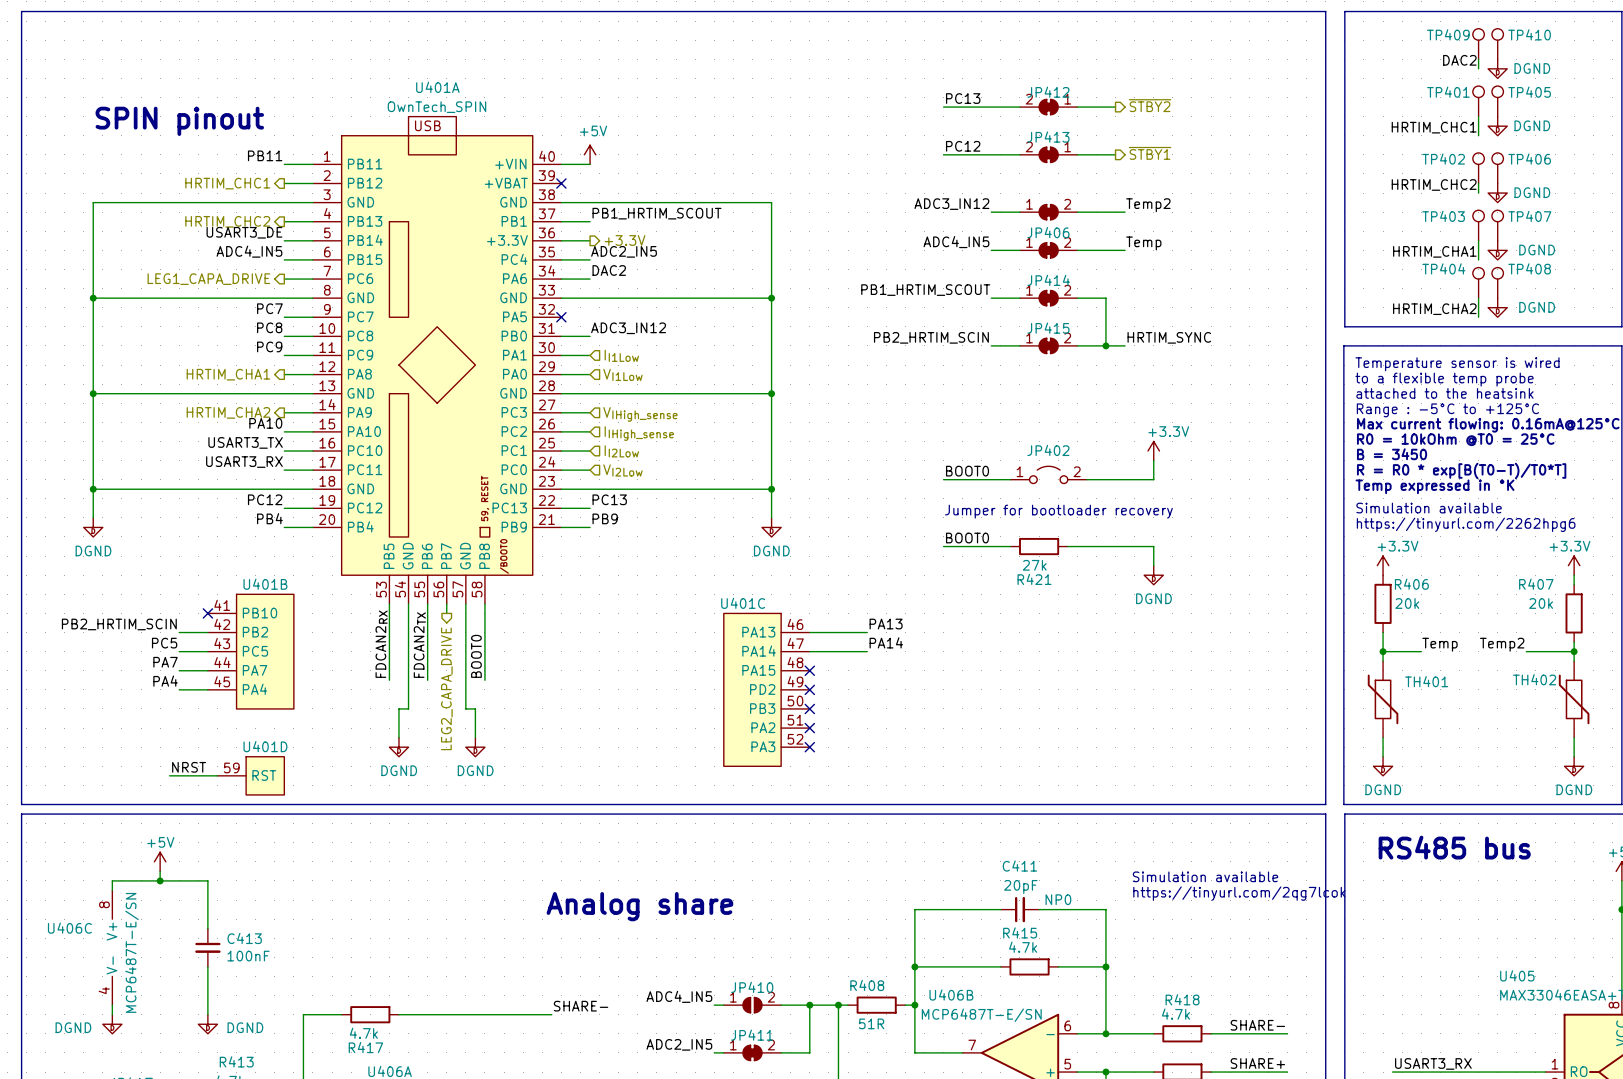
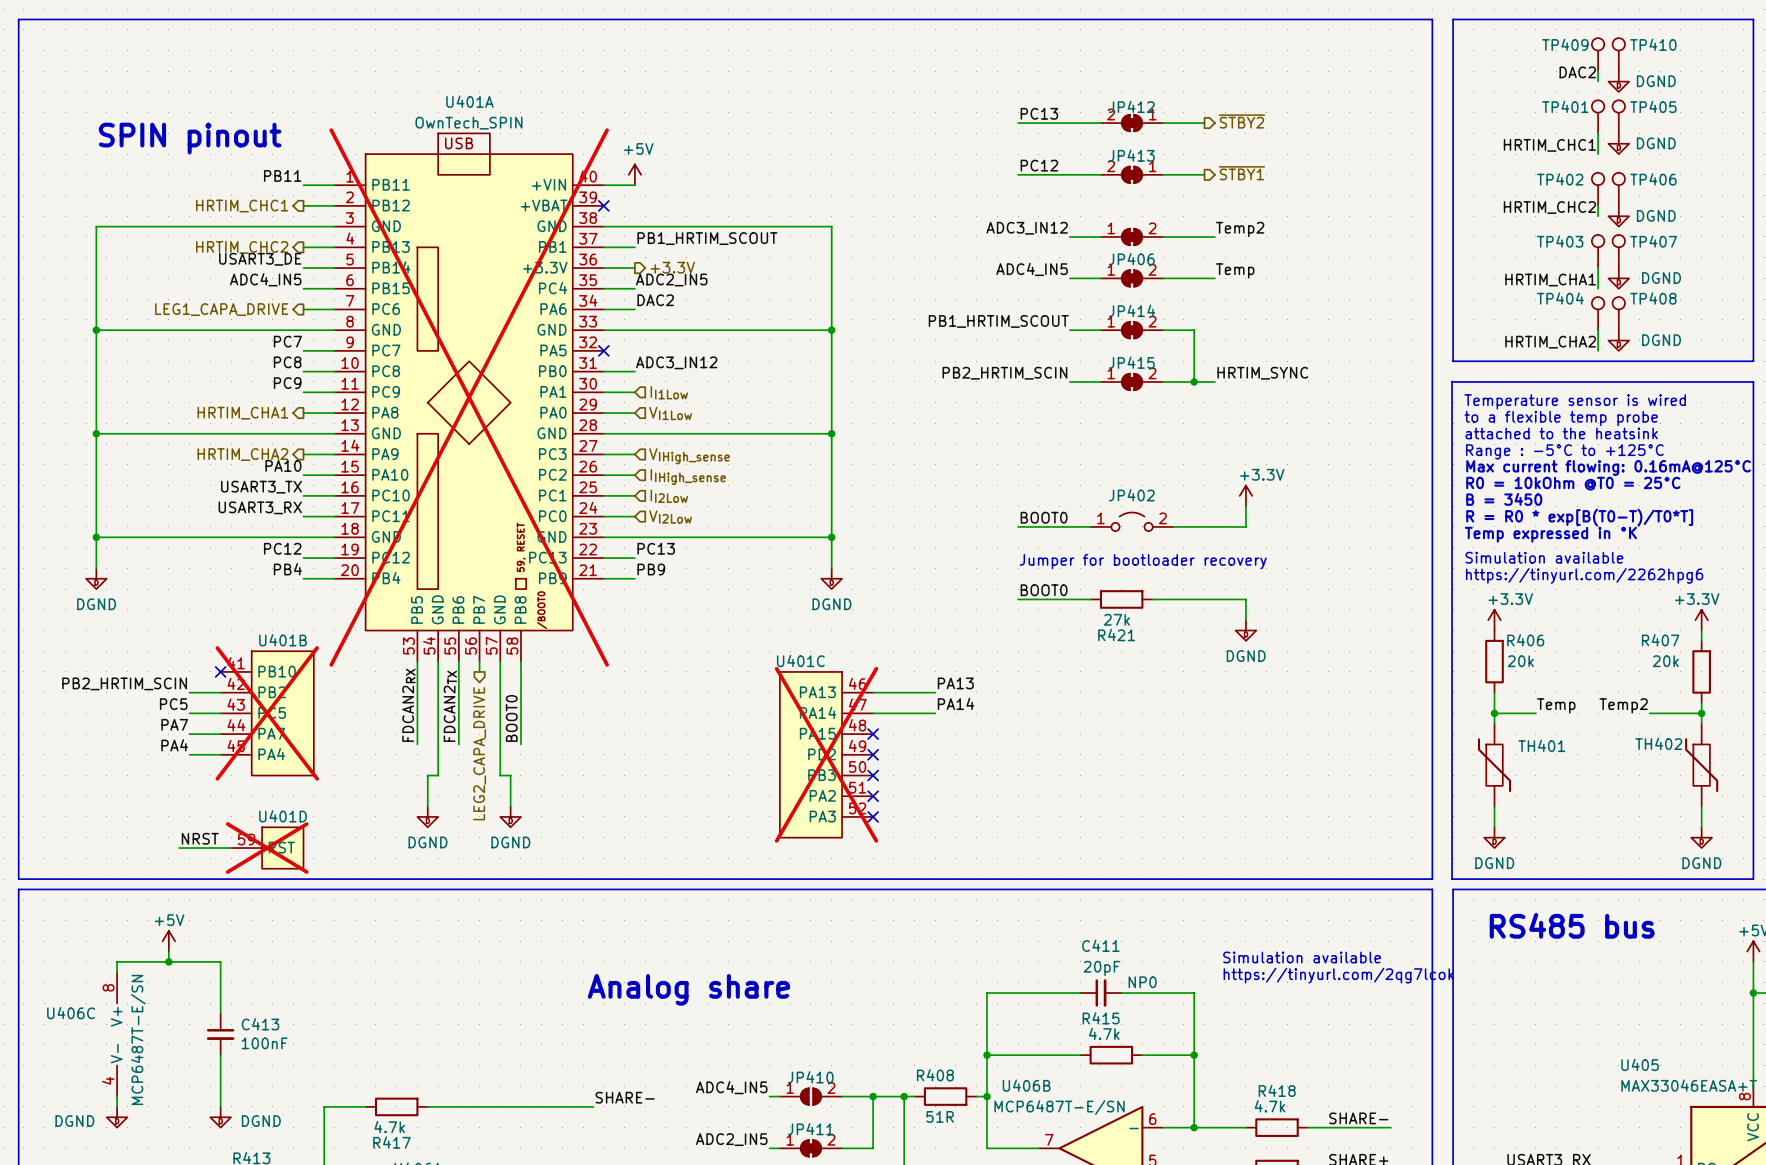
U401A do-not-place cross: none -> (469, 397)
U401B do-not-place cross: none -> (267, 713)
U401C do-not-place cross: none -> (826, 754)
U401D do-not-place cross: none -> (267, 848)

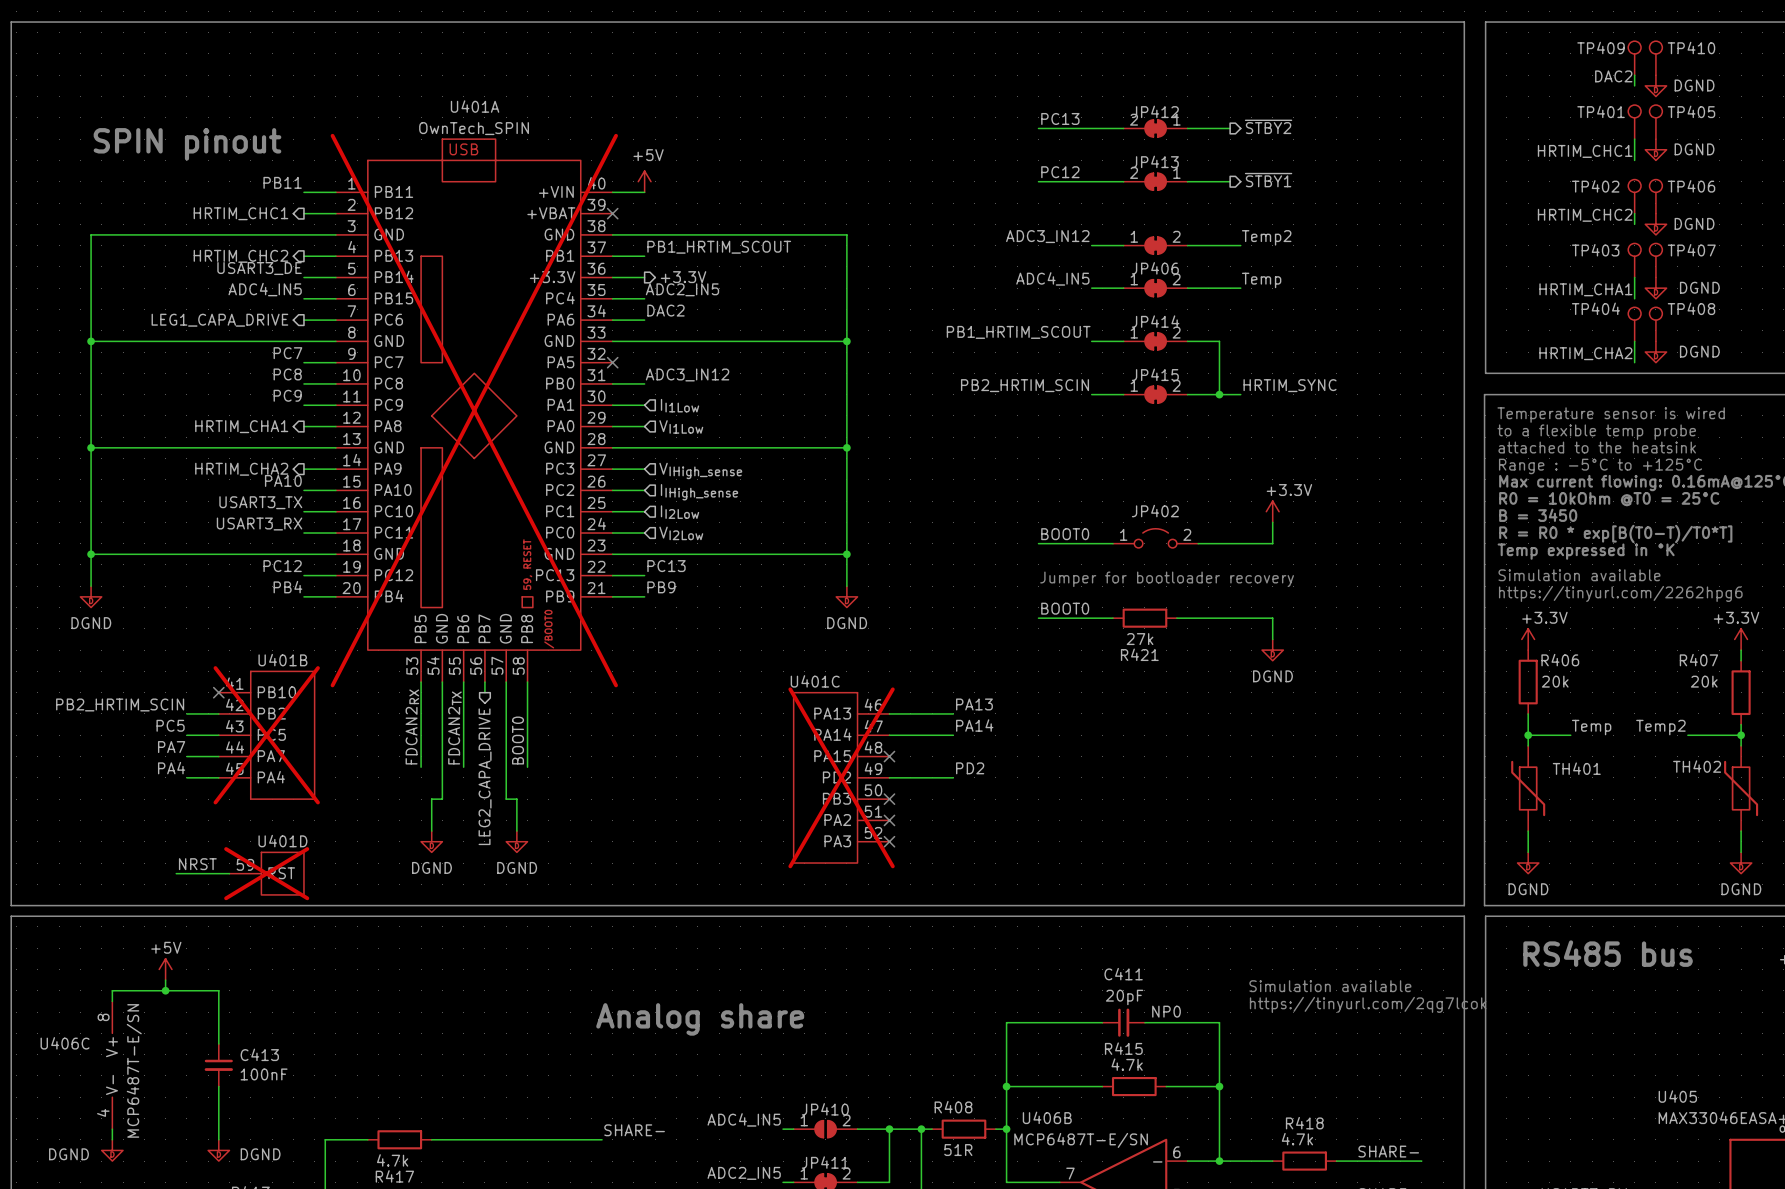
label: none -> PD2 (970, 768)
wire: none -> (889, 777) (953, 777)
no-connect mark: (873, 754) -> none

